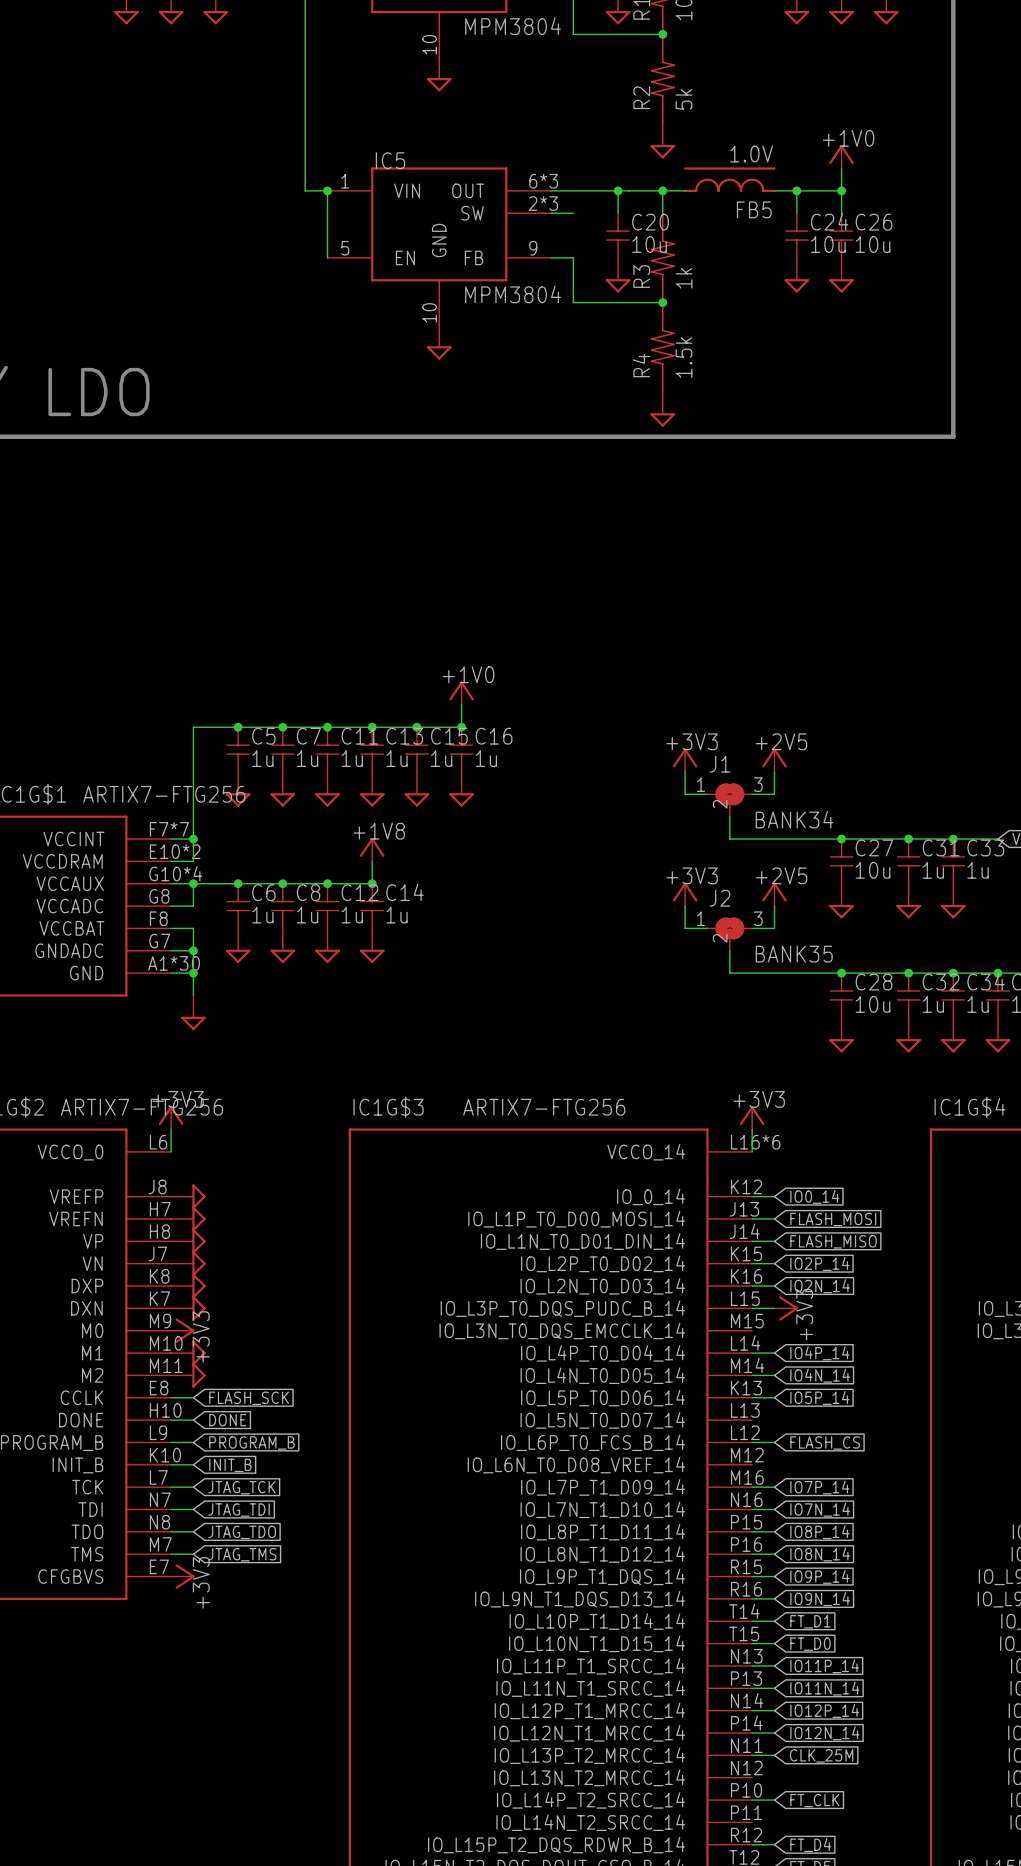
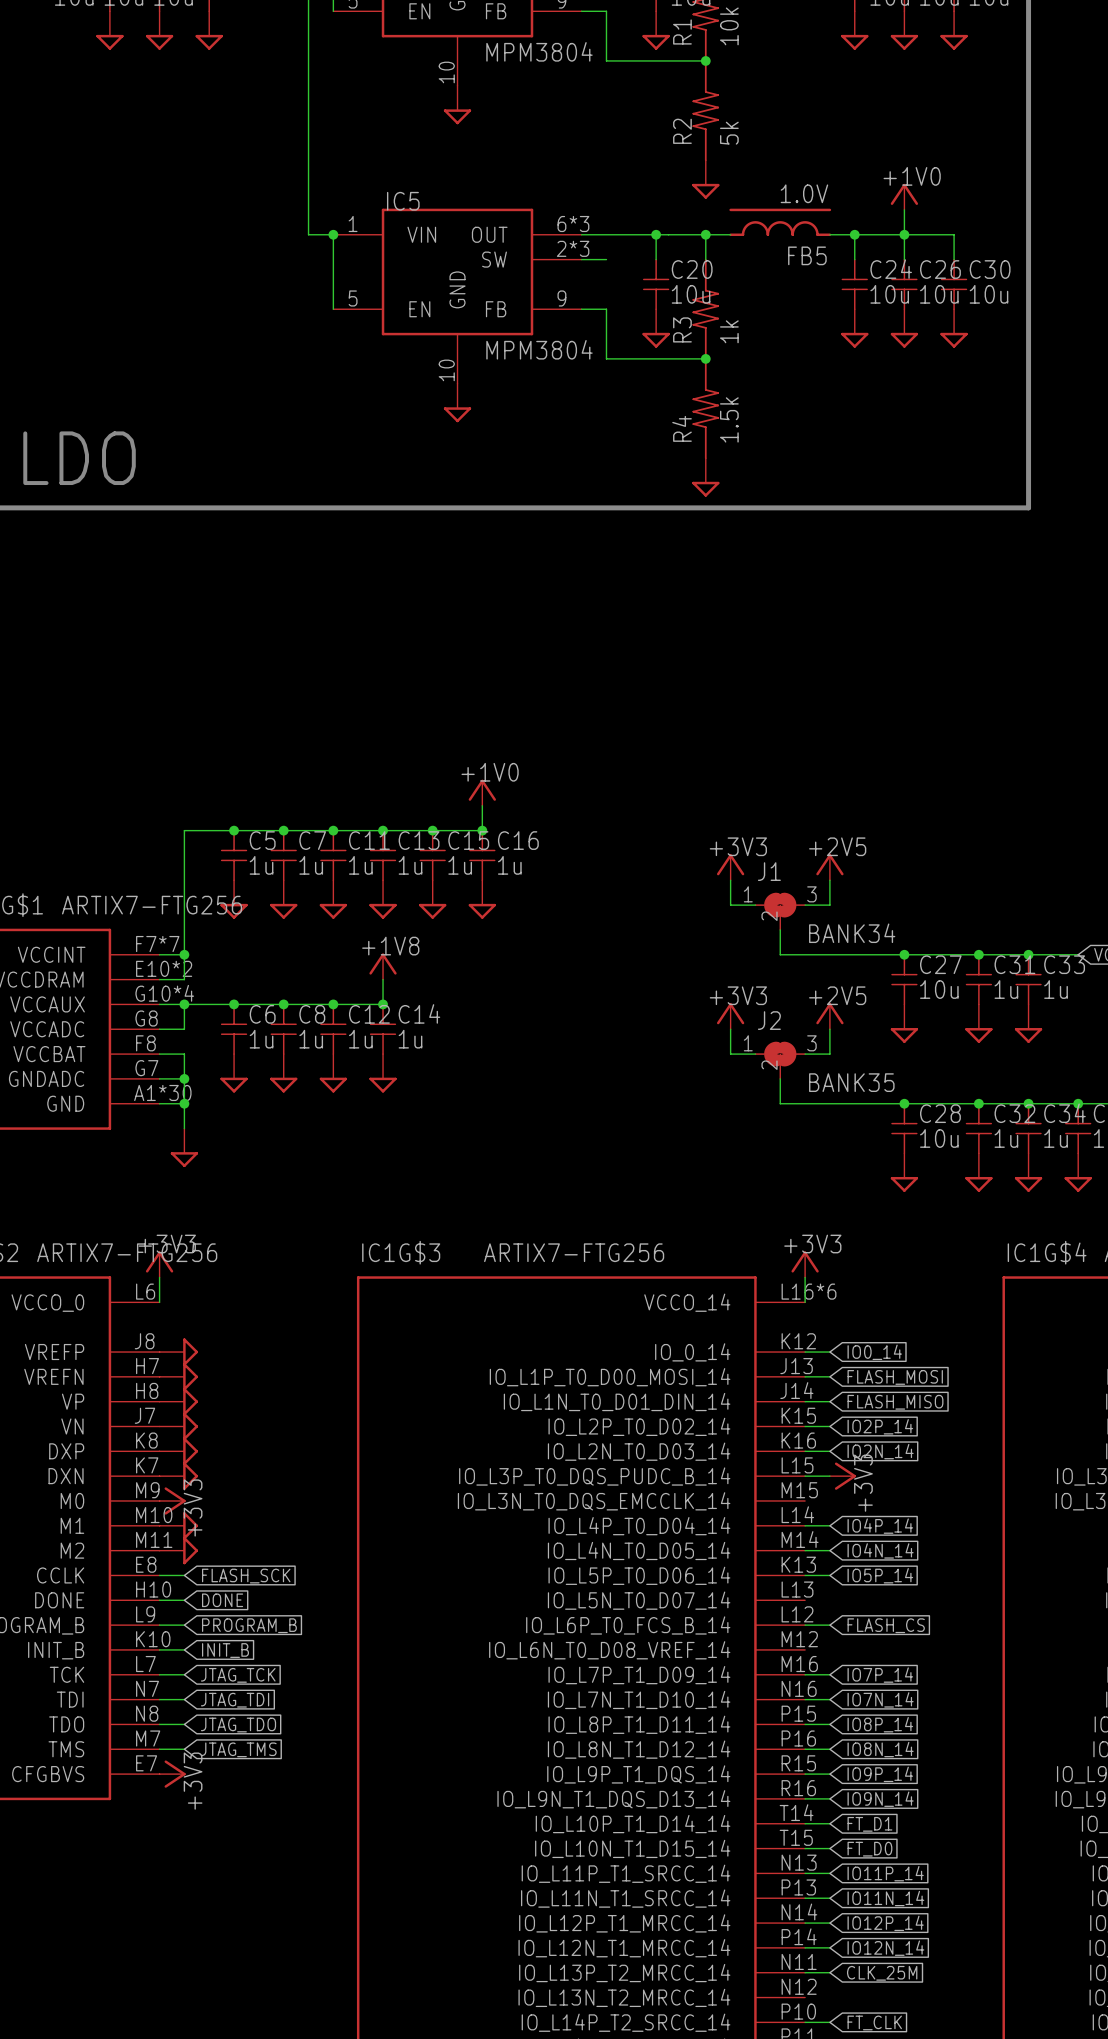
wire: none -> (904, 234) (954, 234) (954, 259)
C30: none -> 10u (954, 284)
power symbol: none -> (954, 328)

